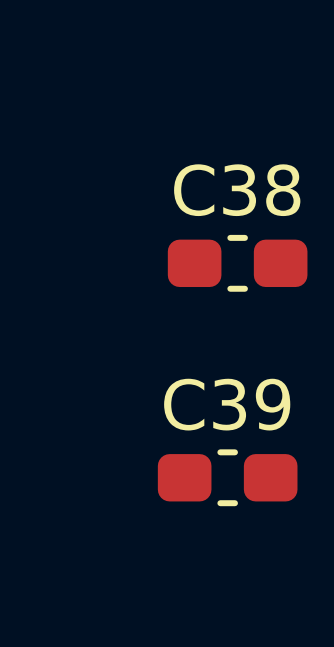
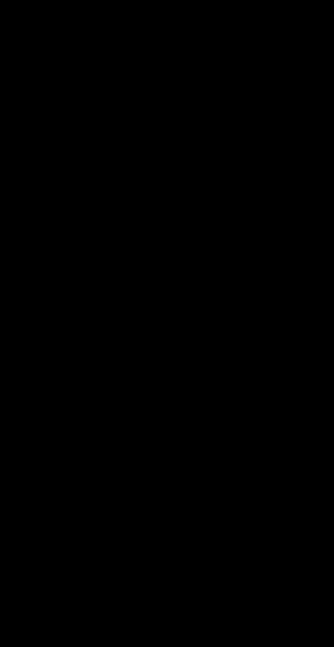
C38: (237, 263) -> none
C39: (227, 477) -> none

